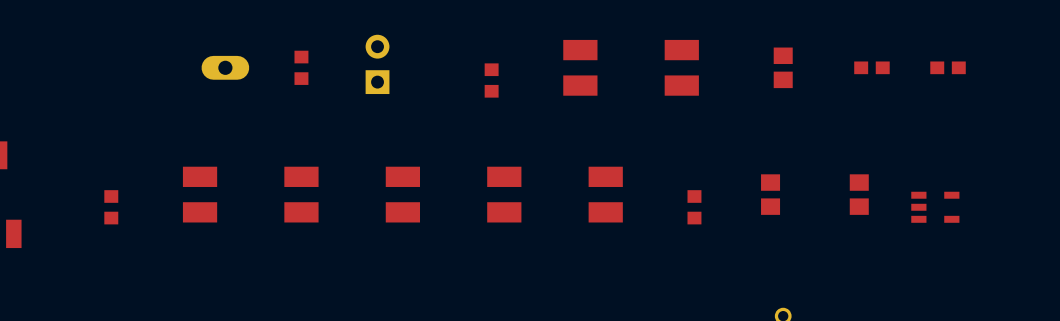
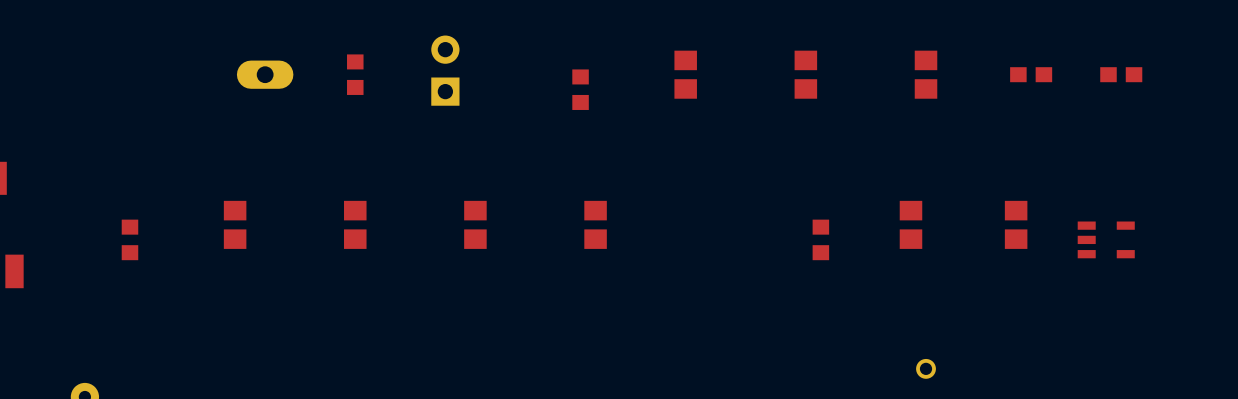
part footprint: [563, 39, 598, 96] -> [674, 50, 697, 99]
part footprint: [664, 39, 699, 96] -> [794, 50, 818, 99]
part footprint: [182, 166, 218, 223] -> [223, 200, 247, 249]
part footprint: [284, 166, 319, 223] -> [344, 200, 367, 249]
part footprint: [385, 166, 420, 223] -> [464, 200, 487, 249]
part footprint: [487, 166, 522, 223] -> [584, 200, 607, 249]
part: (605, 194) -> none

